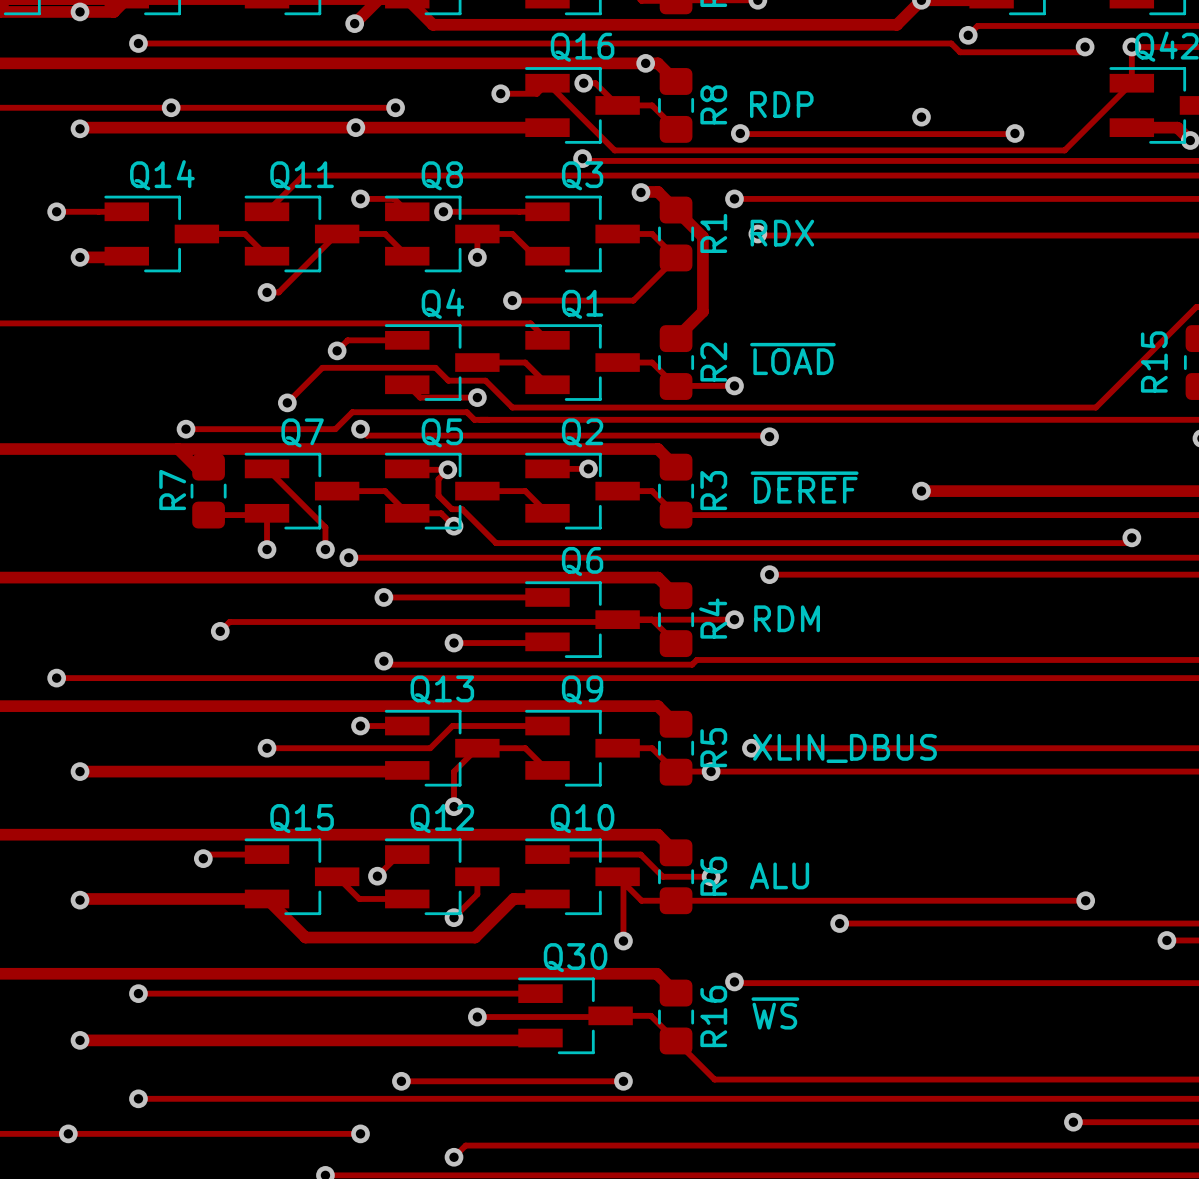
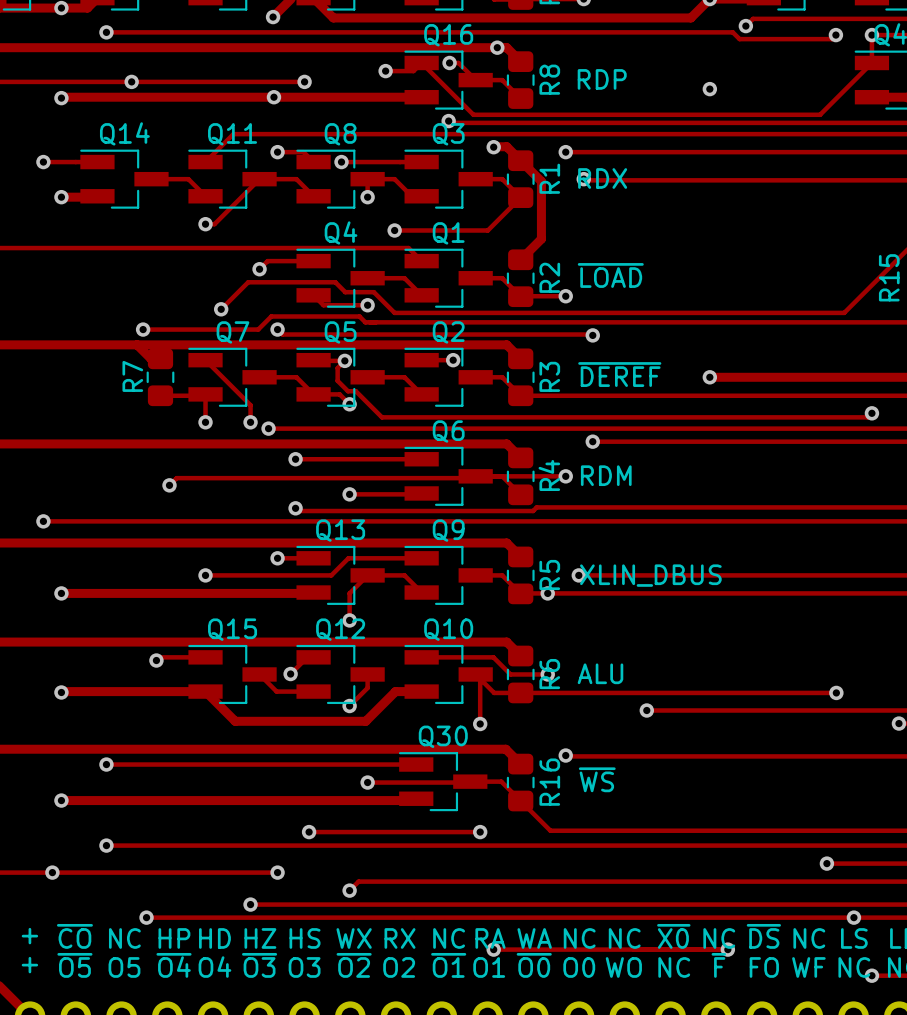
track: (740, 133) (1014, 133) -> none
via: (740, 133) -> none
via: (1014, 133) -> none

